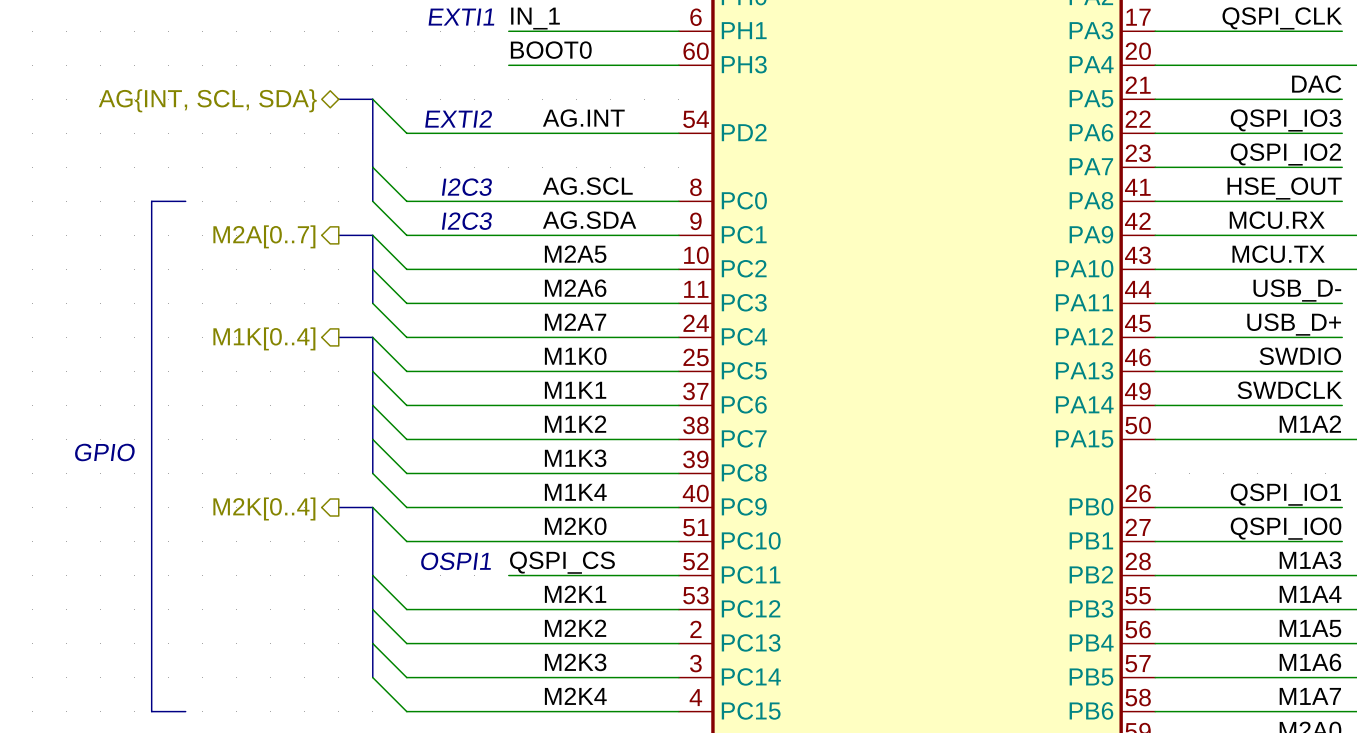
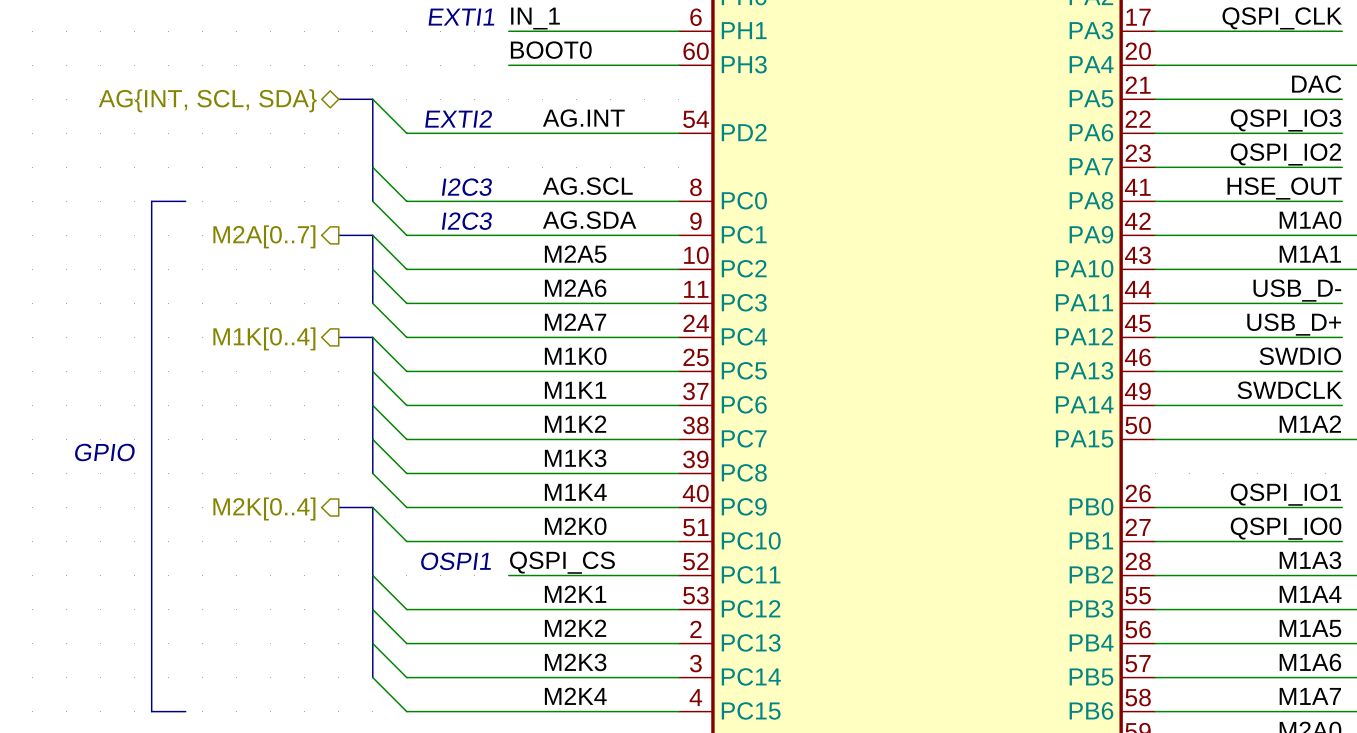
label: MCU.RX (1277, 220) -> none
label: none -> M1A0 (1310, 220)
label: MCU.TX (1278, 254) -> none
label: none -> M1A1 (1310, 254)

